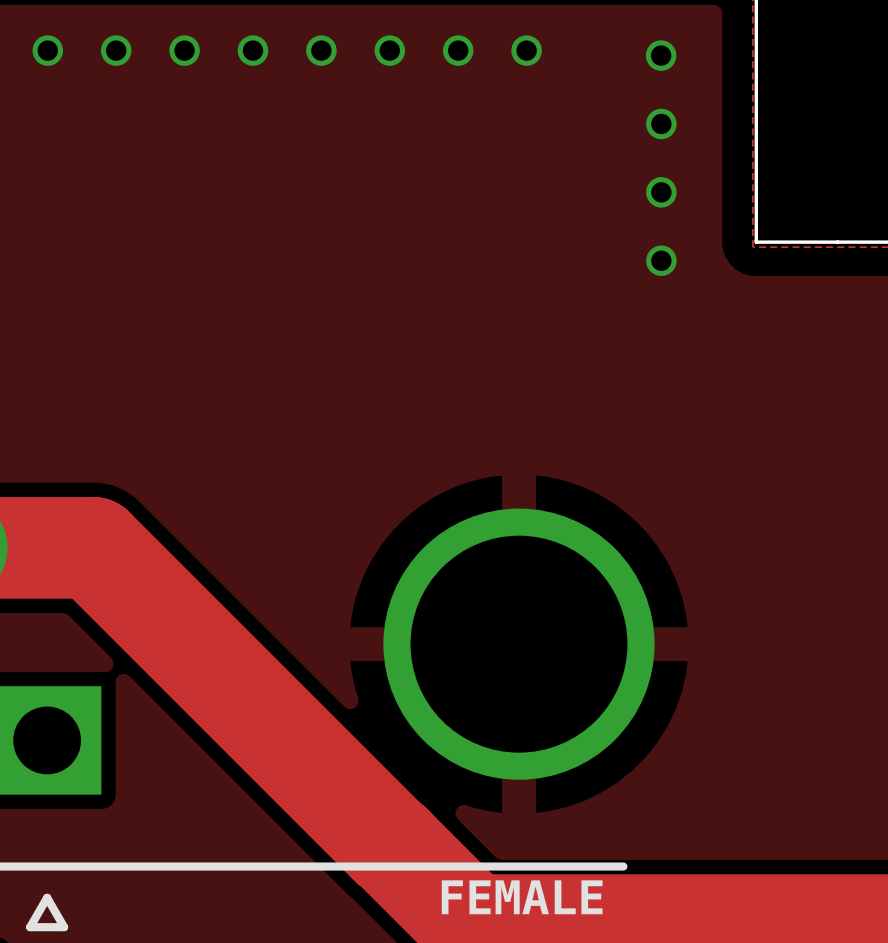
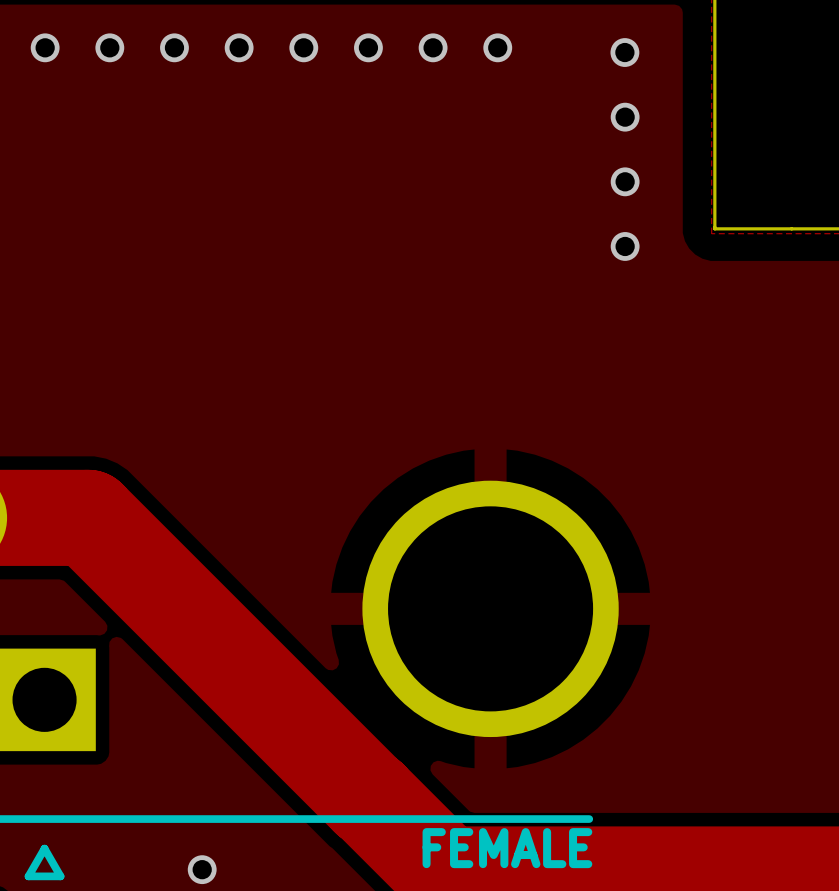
via: none -> (202, 869)

